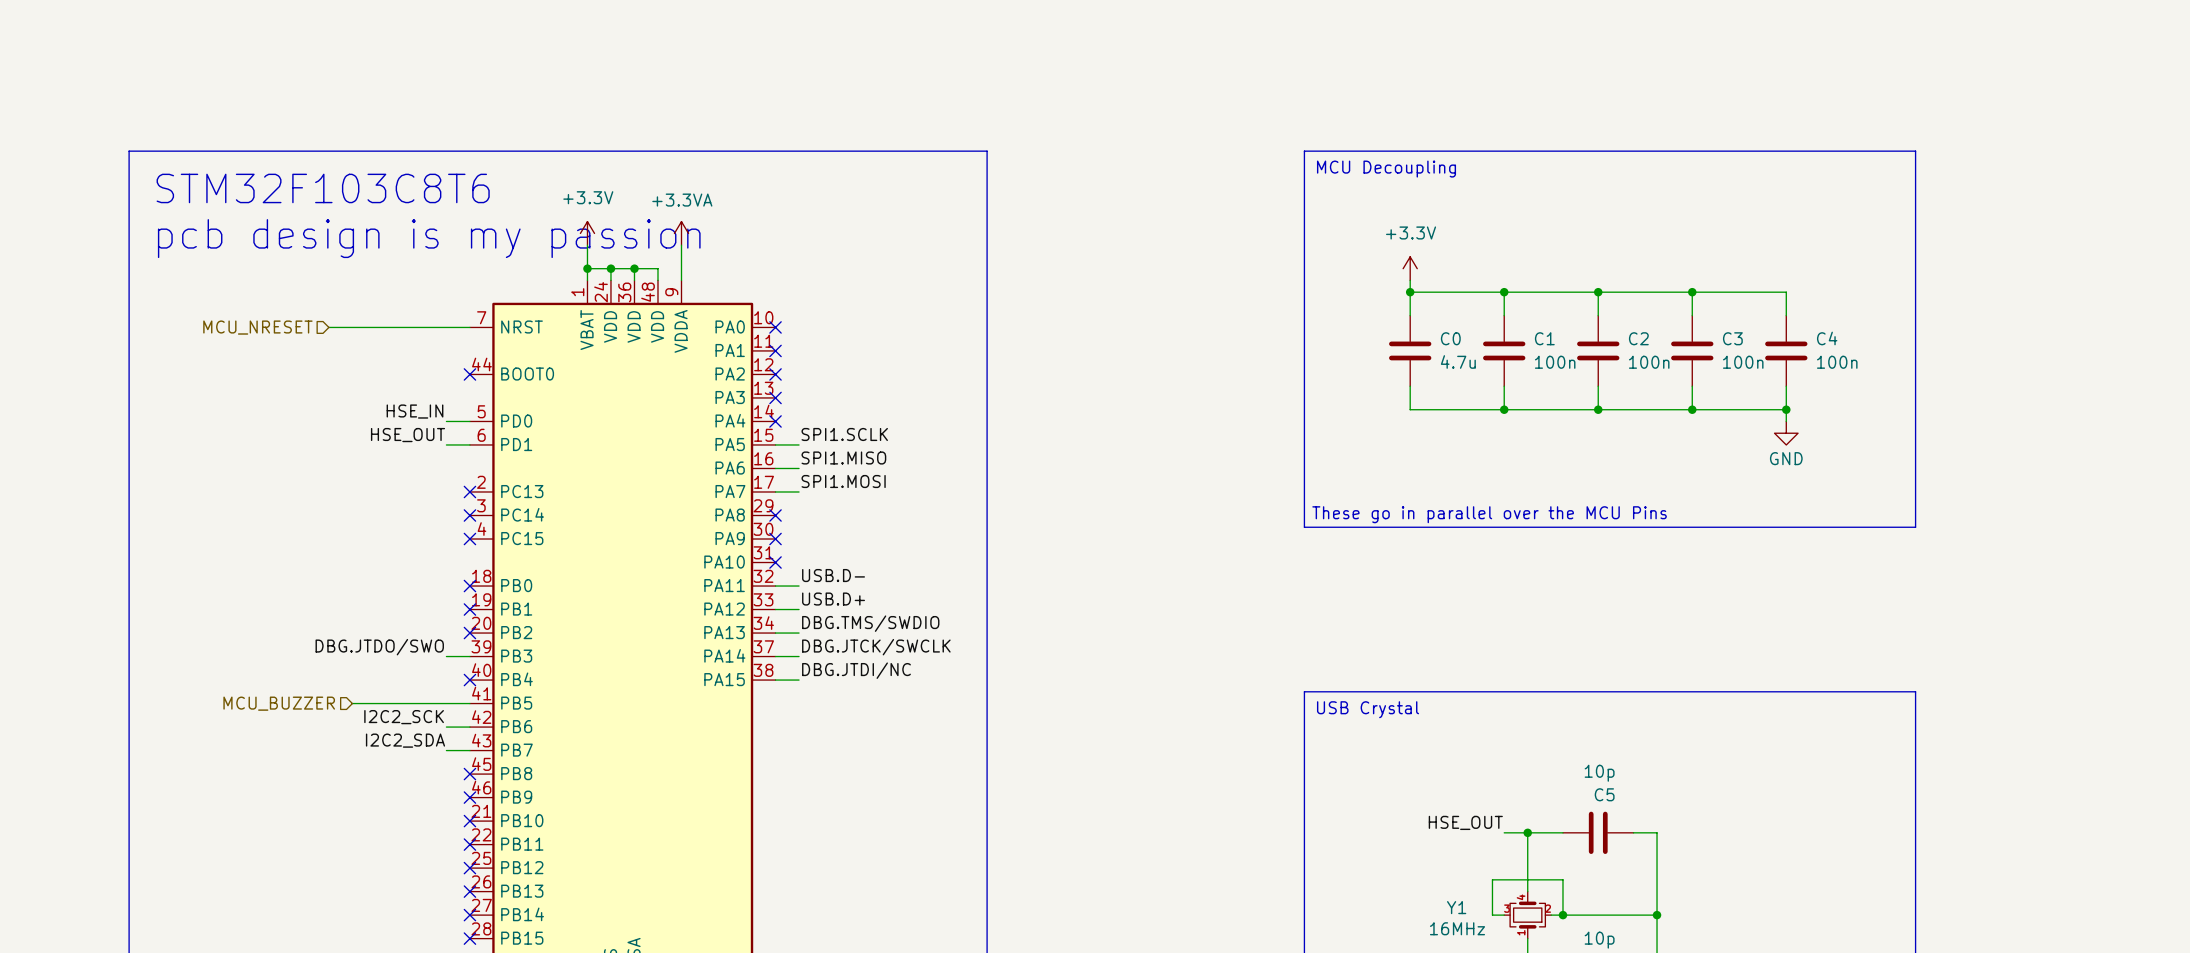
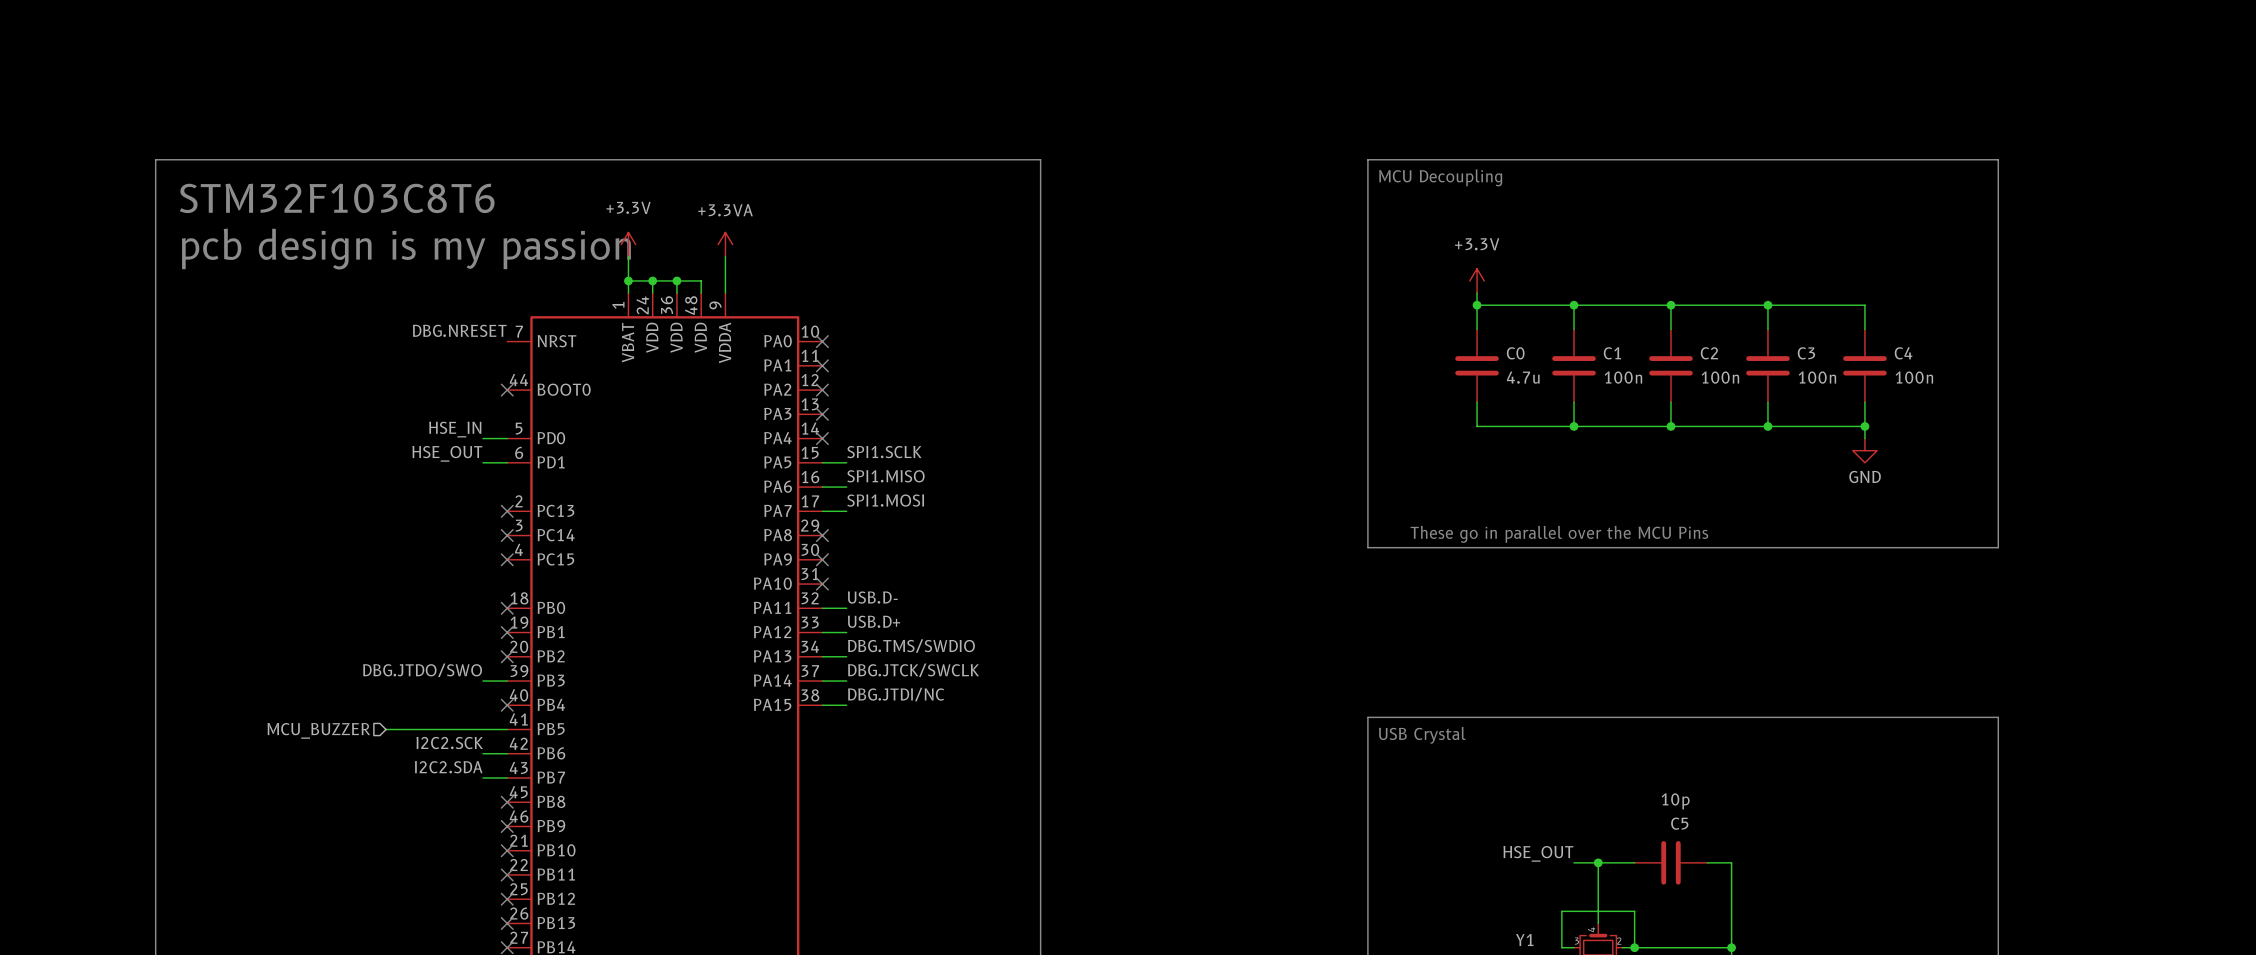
label: none -> DBG.NRESET (459, 330)
hierarchical label: MCU_NRESET (257, 327) -> none
wire: (328, 327) (469, 327) -> none
label: I2C2_SCK (404, 717) -> I2C2.SCK (449, 743)
label: I2C2_SDA (405, 740) -> I2C2.SDA (448, 767)

